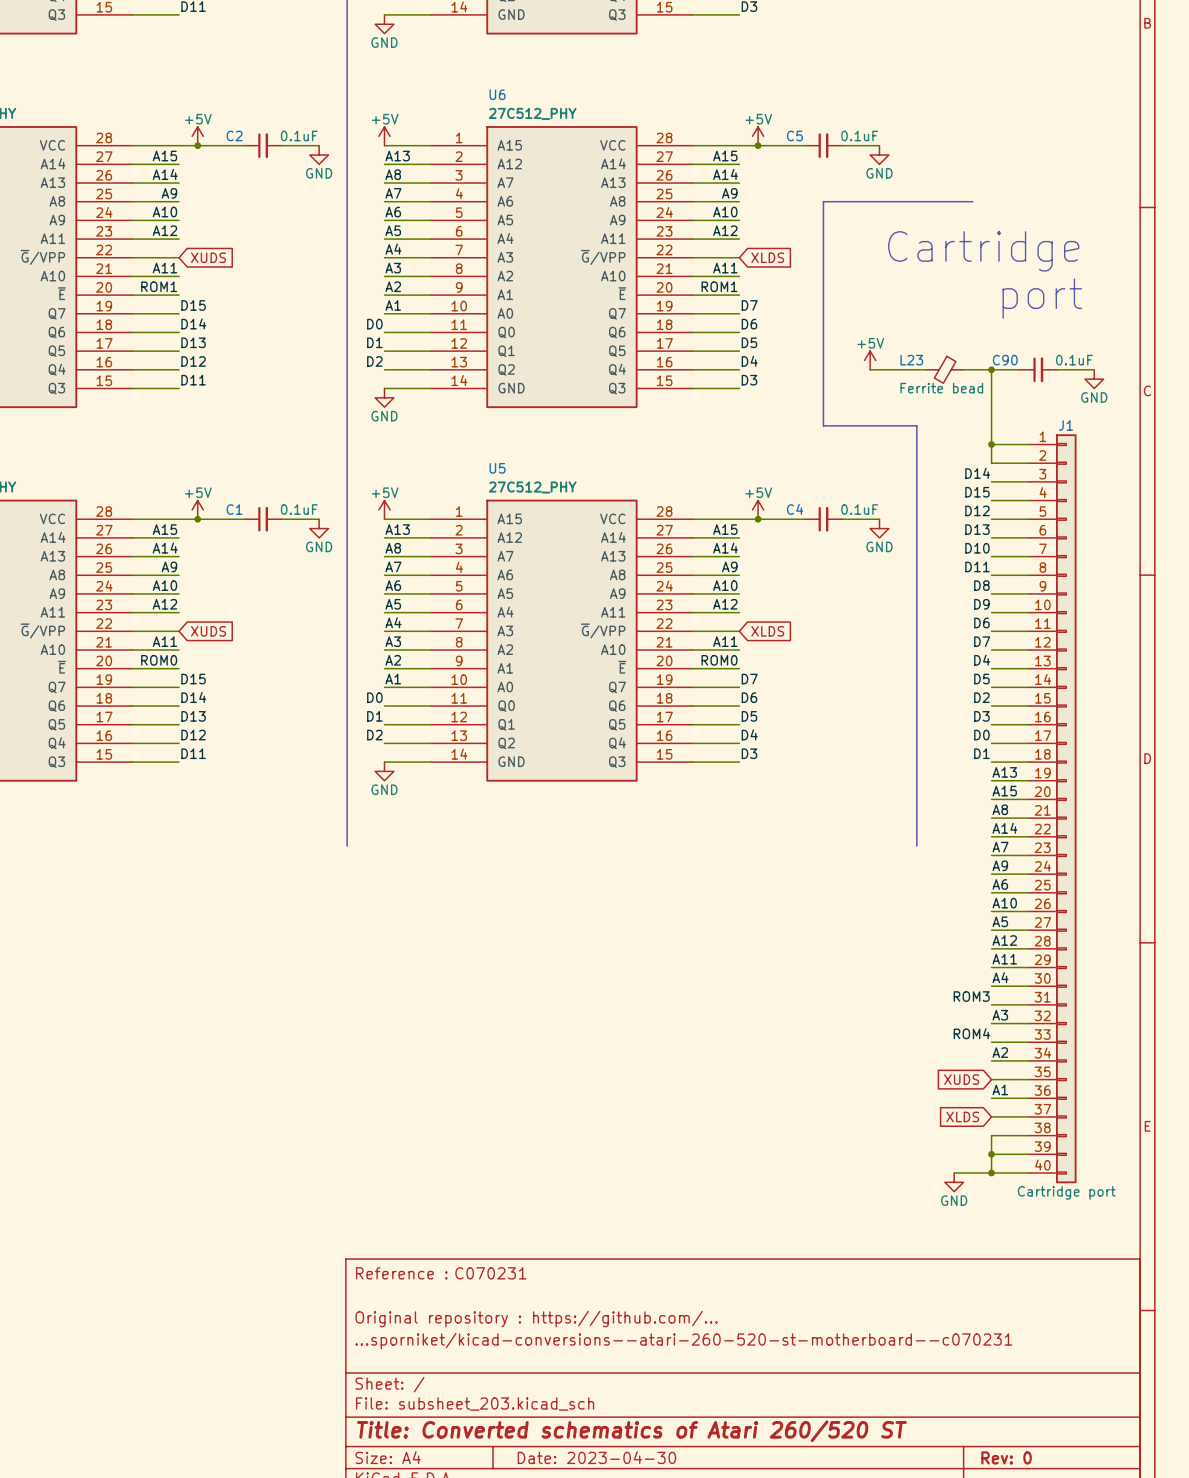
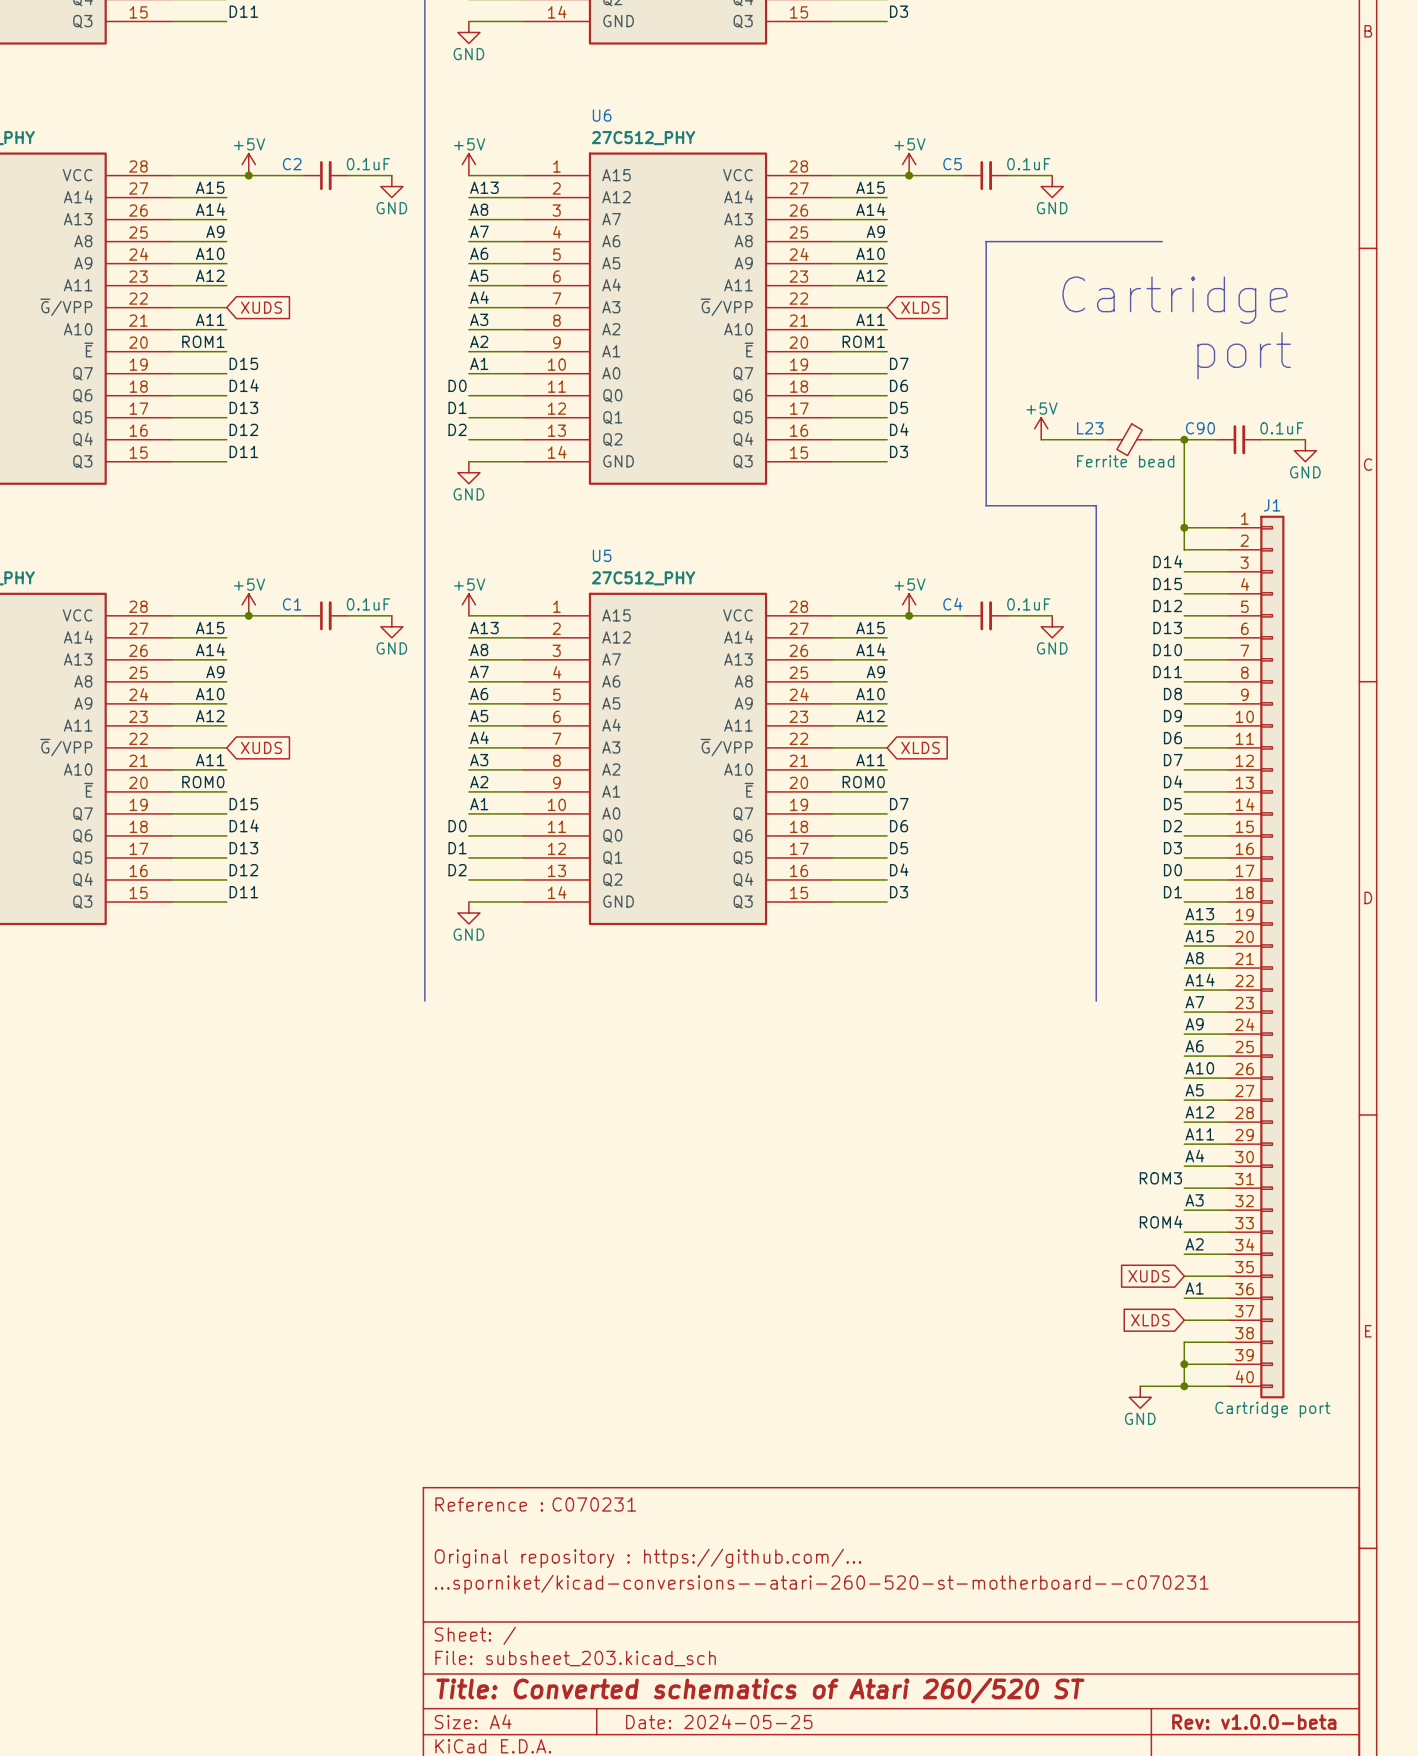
title block: Date: 2023-04-30 (596, 1457) -> Date: 2024-05-25 (719, 1721)
title block: Rev: 0 (1006, 1457) -> Rev: v1.0.0-beta (1254, 1722)

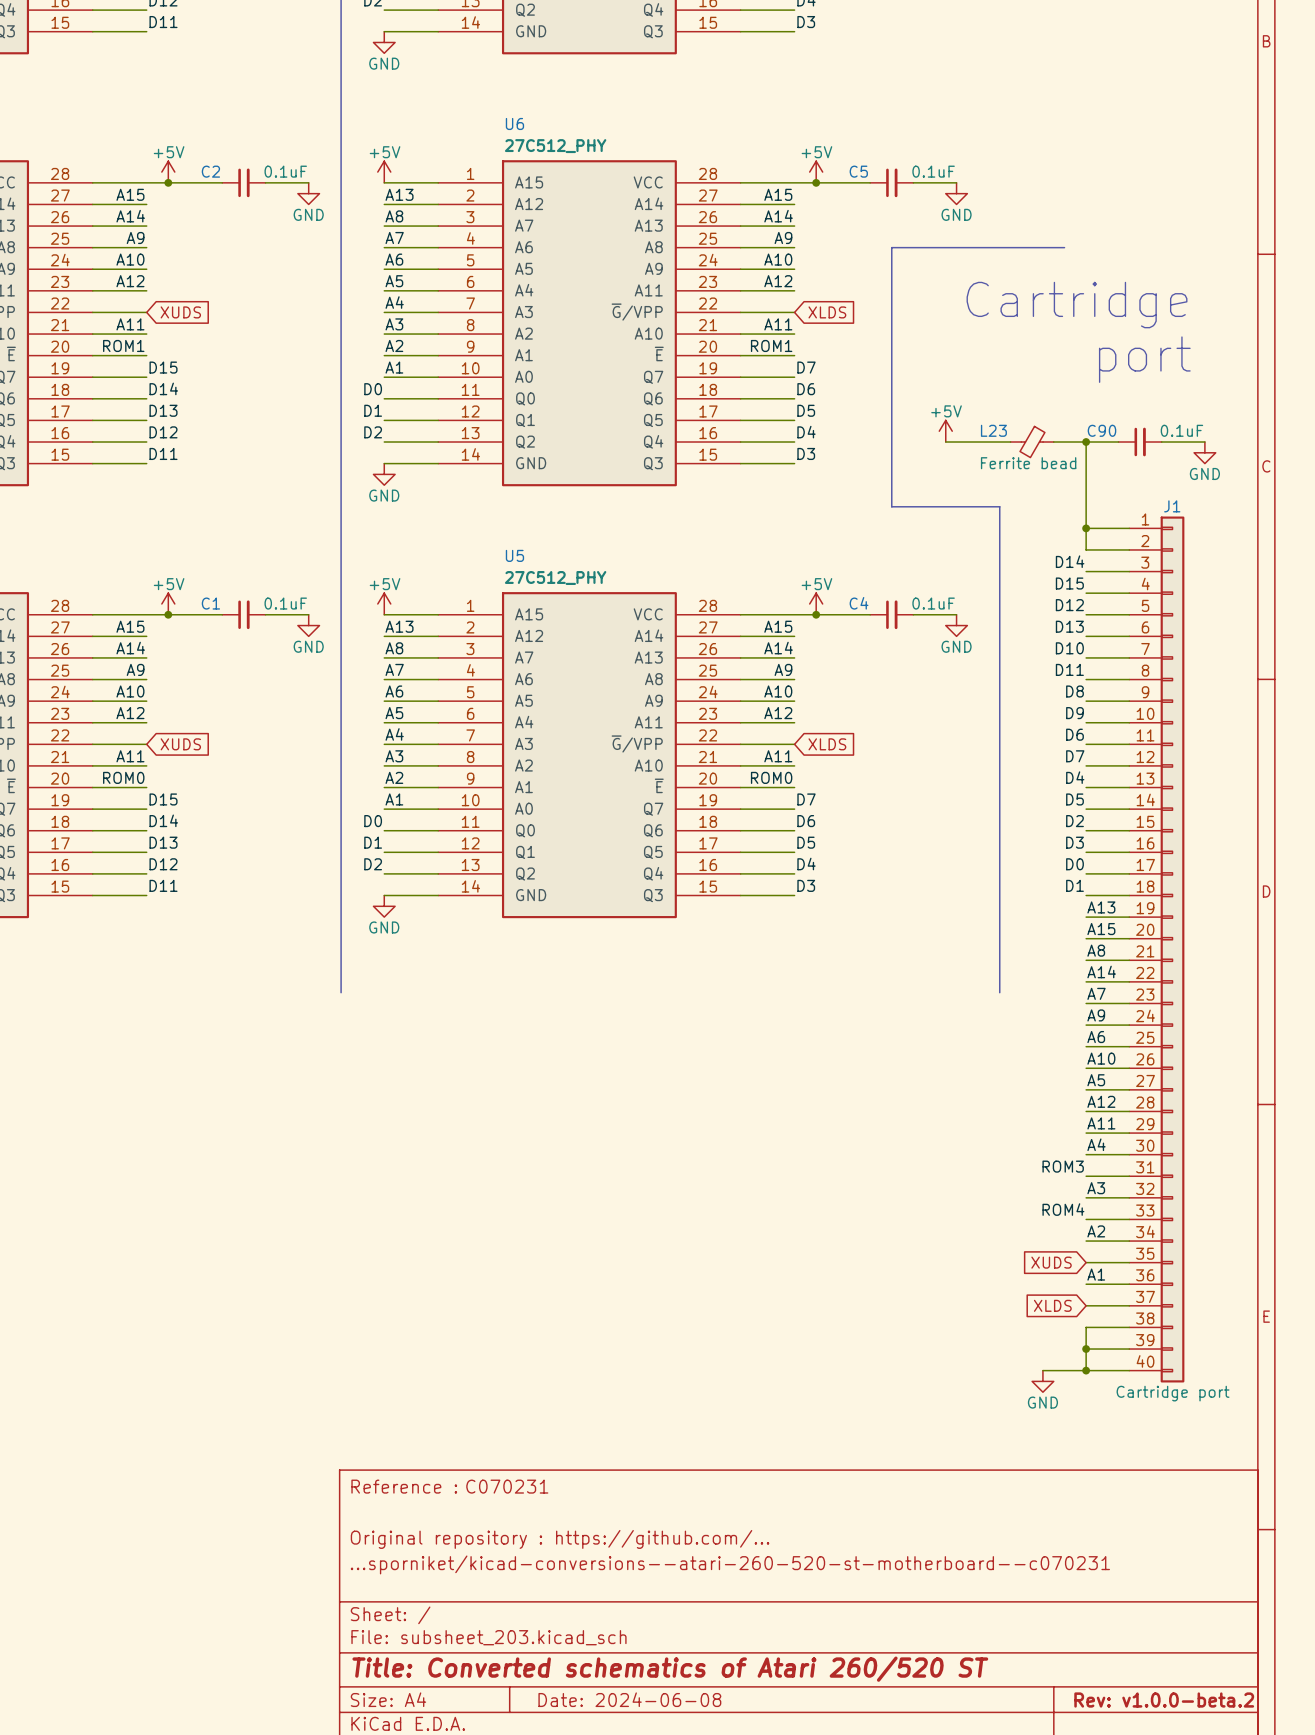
title block: Date: 2024-05-25 (719, 1721) -> Date: 2024-06-08 (629, 1699)
title block: Rev: v1.0.0-beta (1254, 1722) -> Rev: v1.0.0-beta.2 (1164, 1700)

